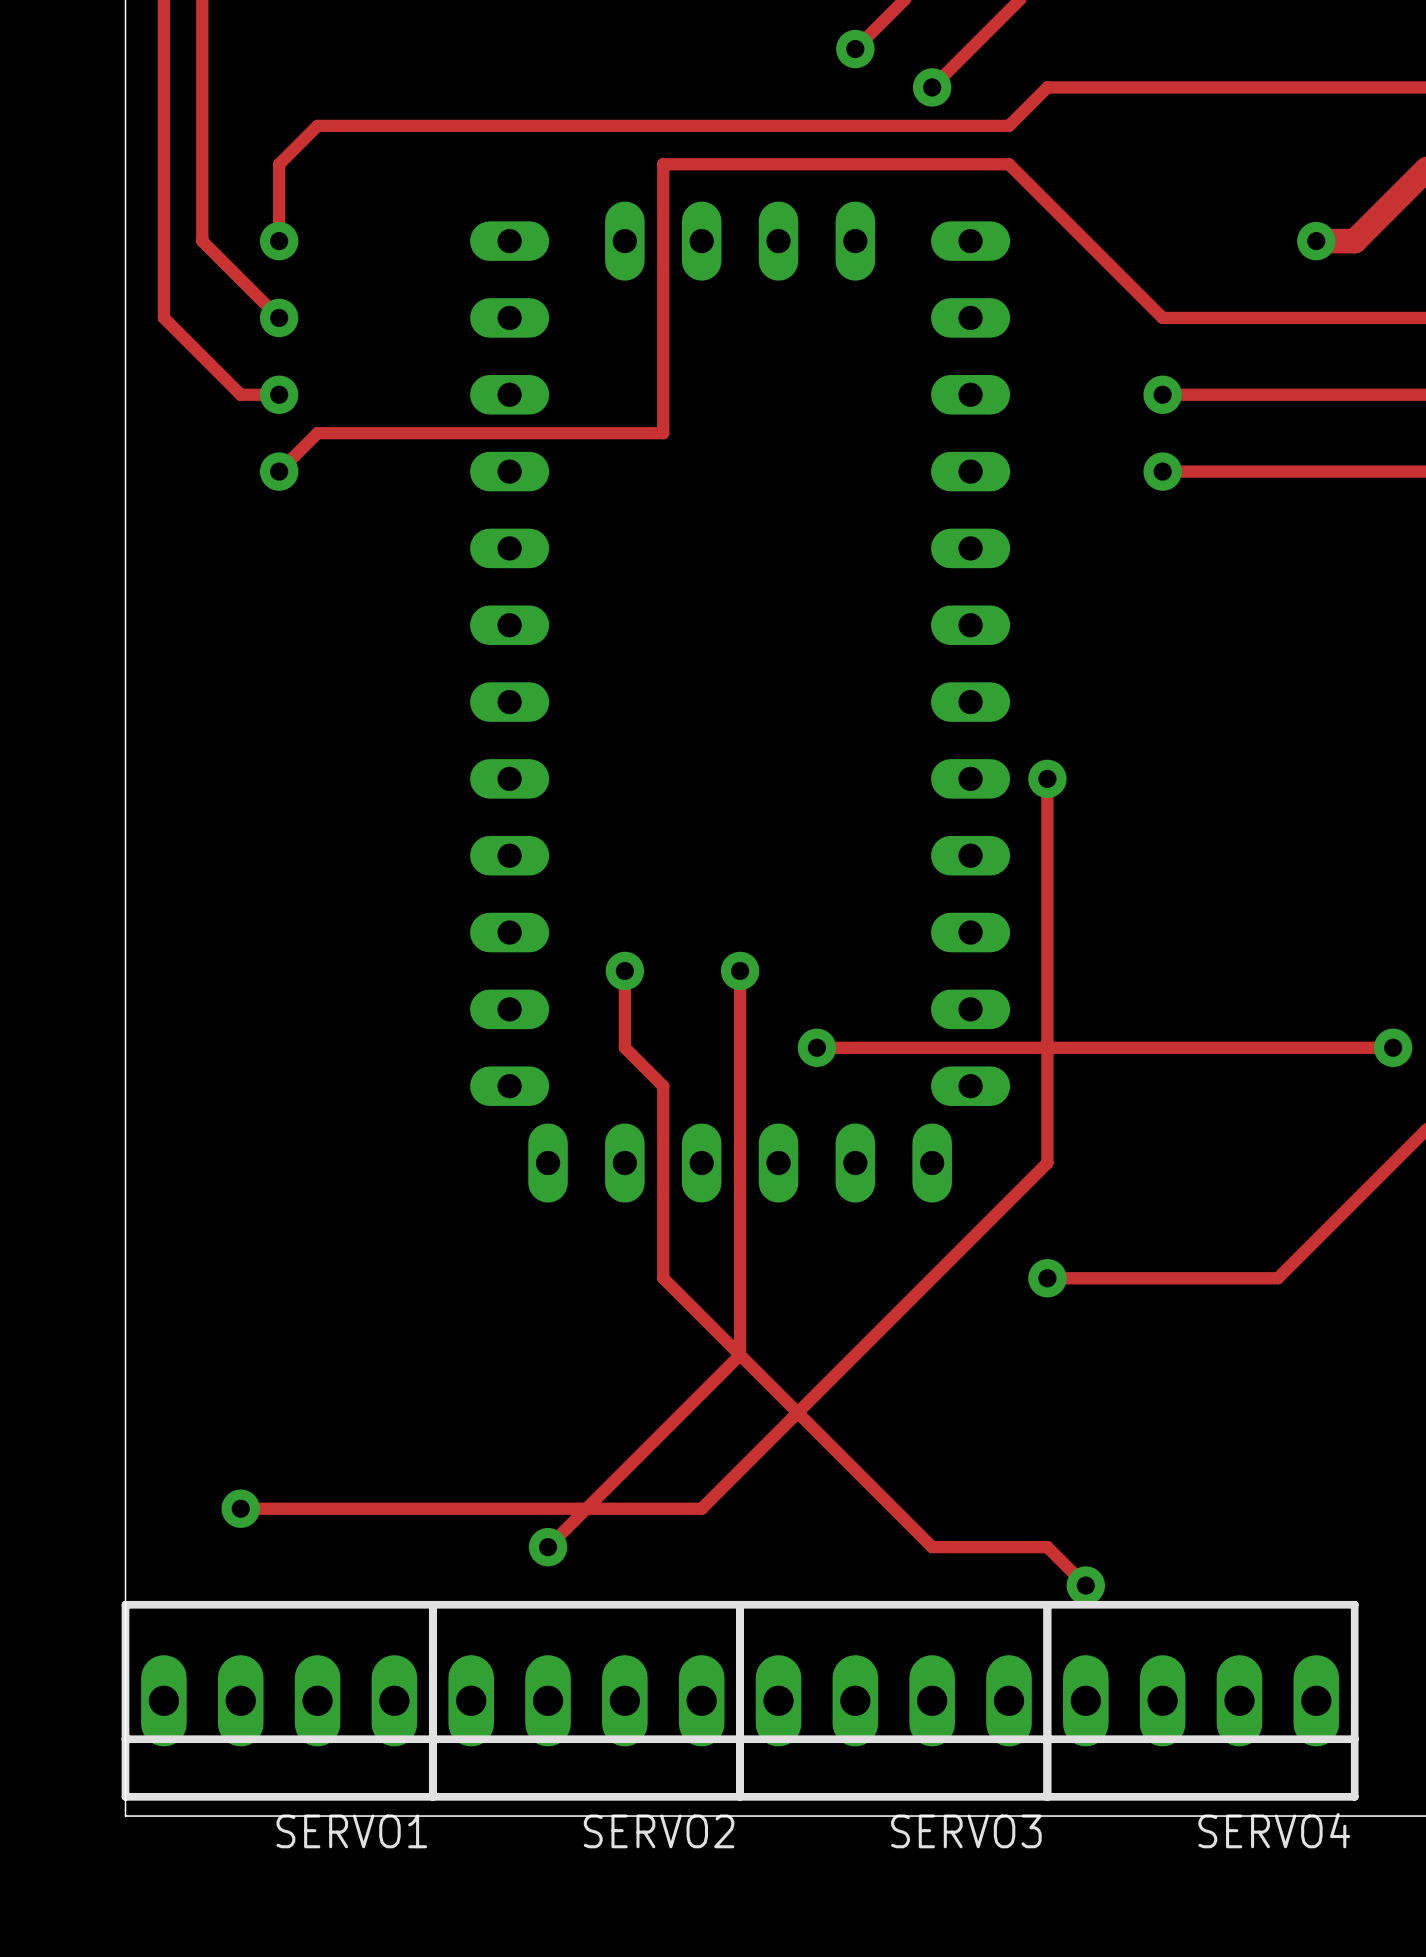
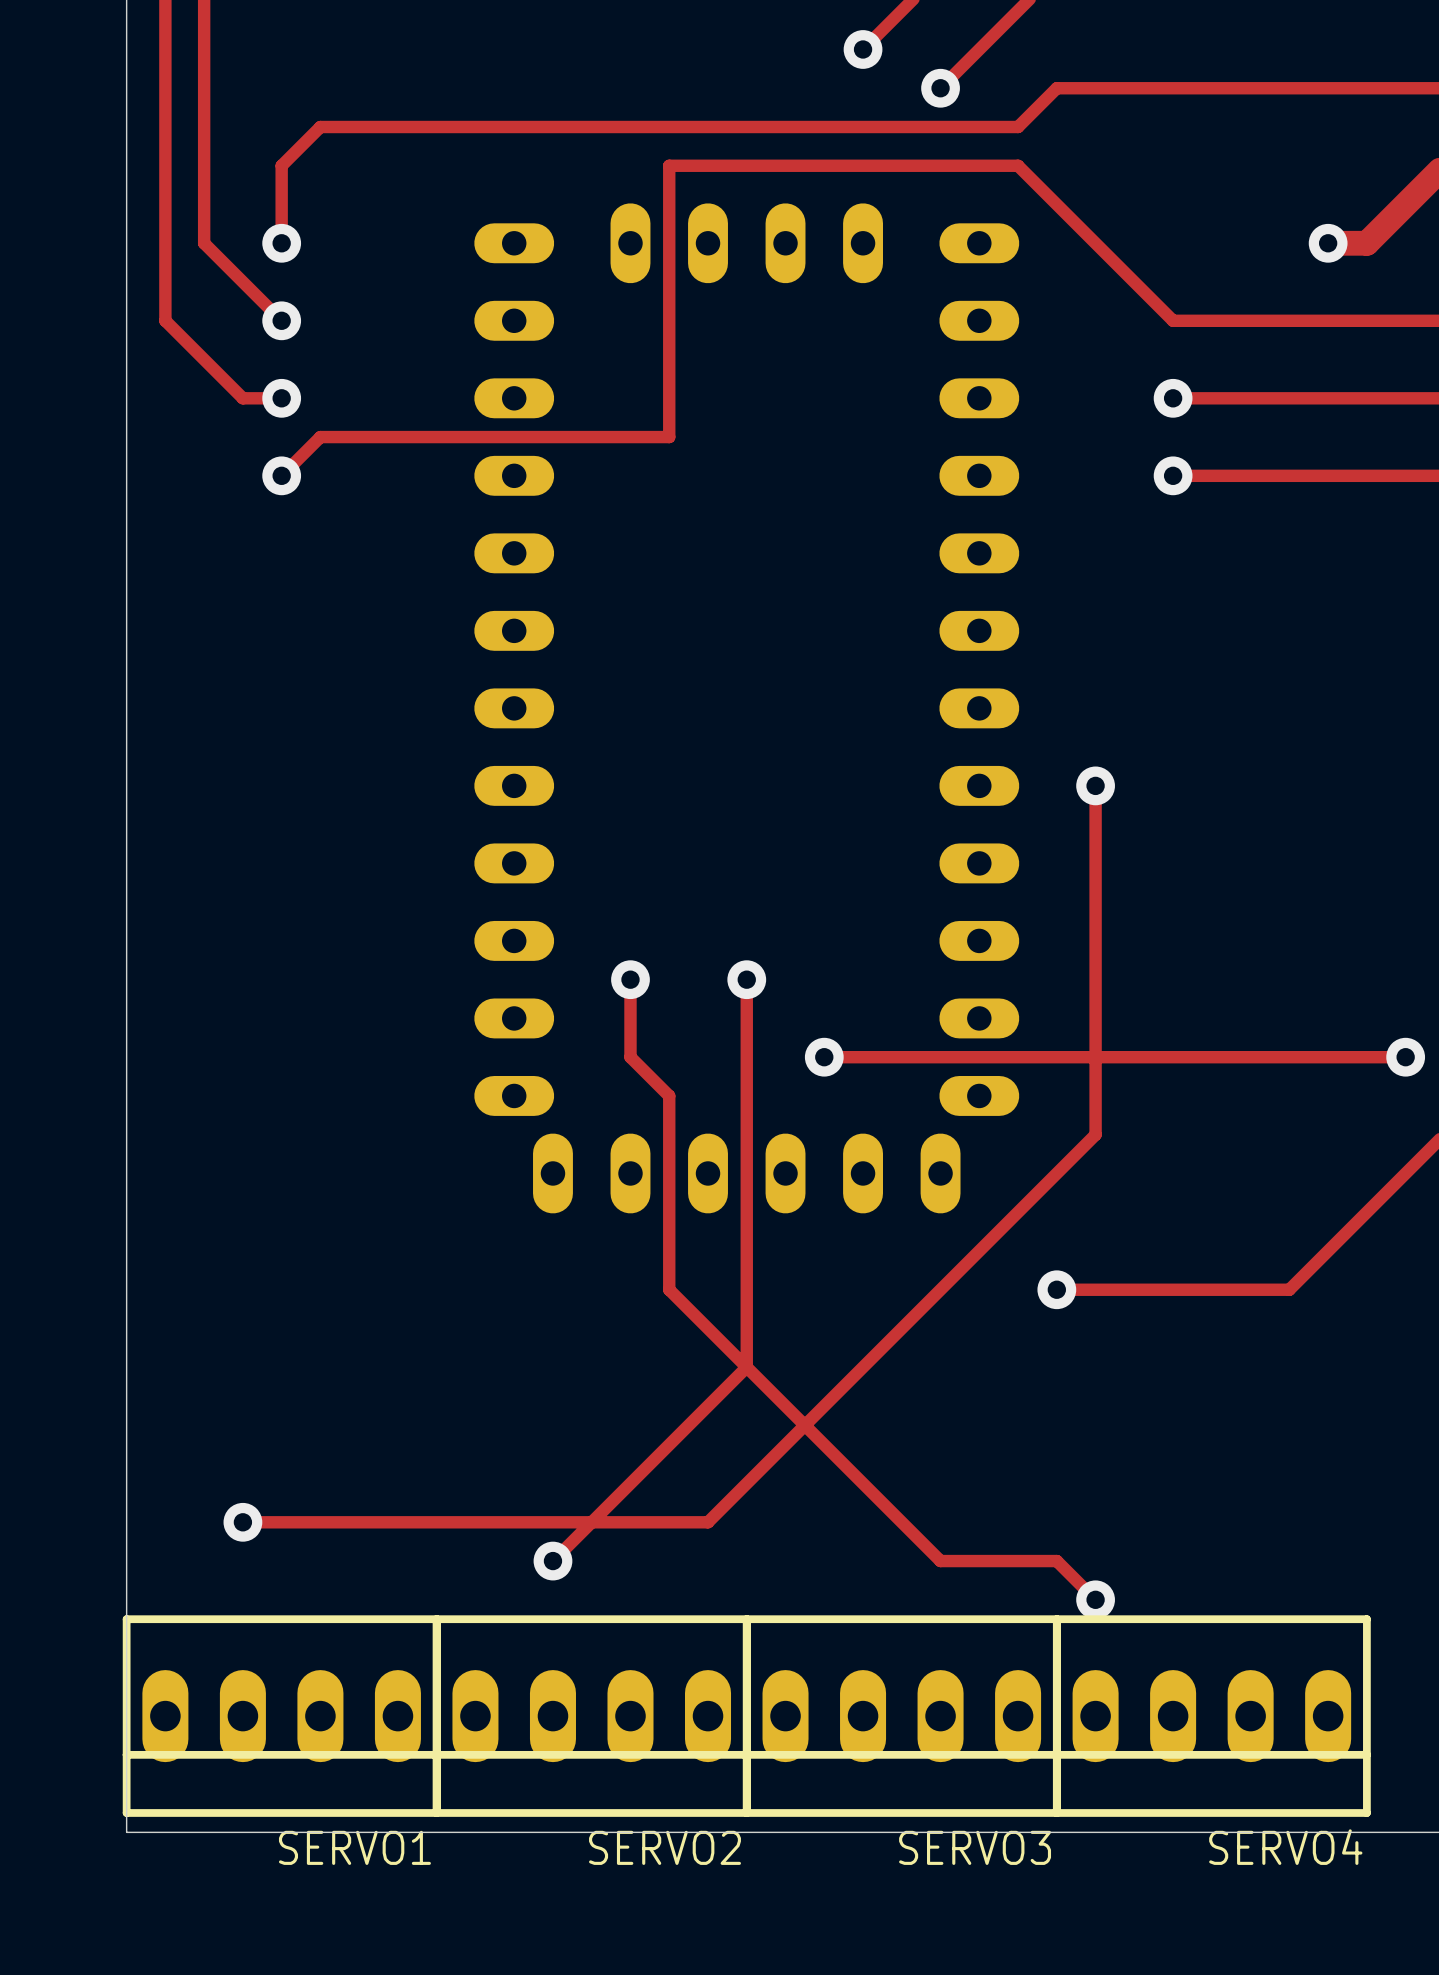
track: (1047, 778) (1047, 1163) -> (1095, 785) (1095, 1134) (1056, 1173)
via position: (1047, 778) -> (1095, 785)

